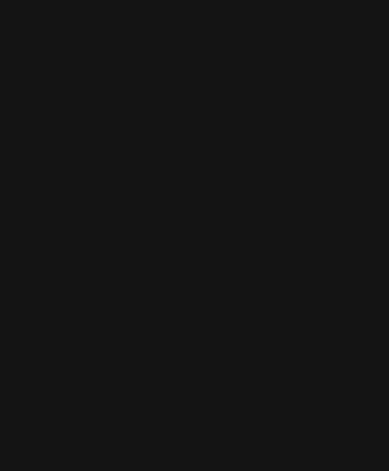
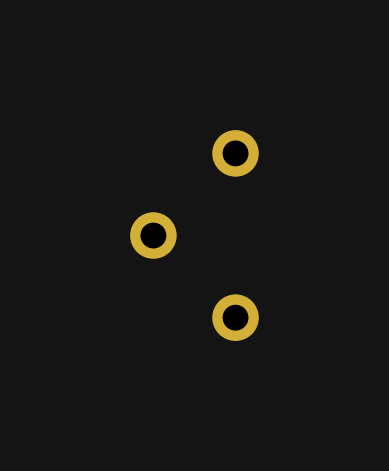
part: none -> (194, 235)

